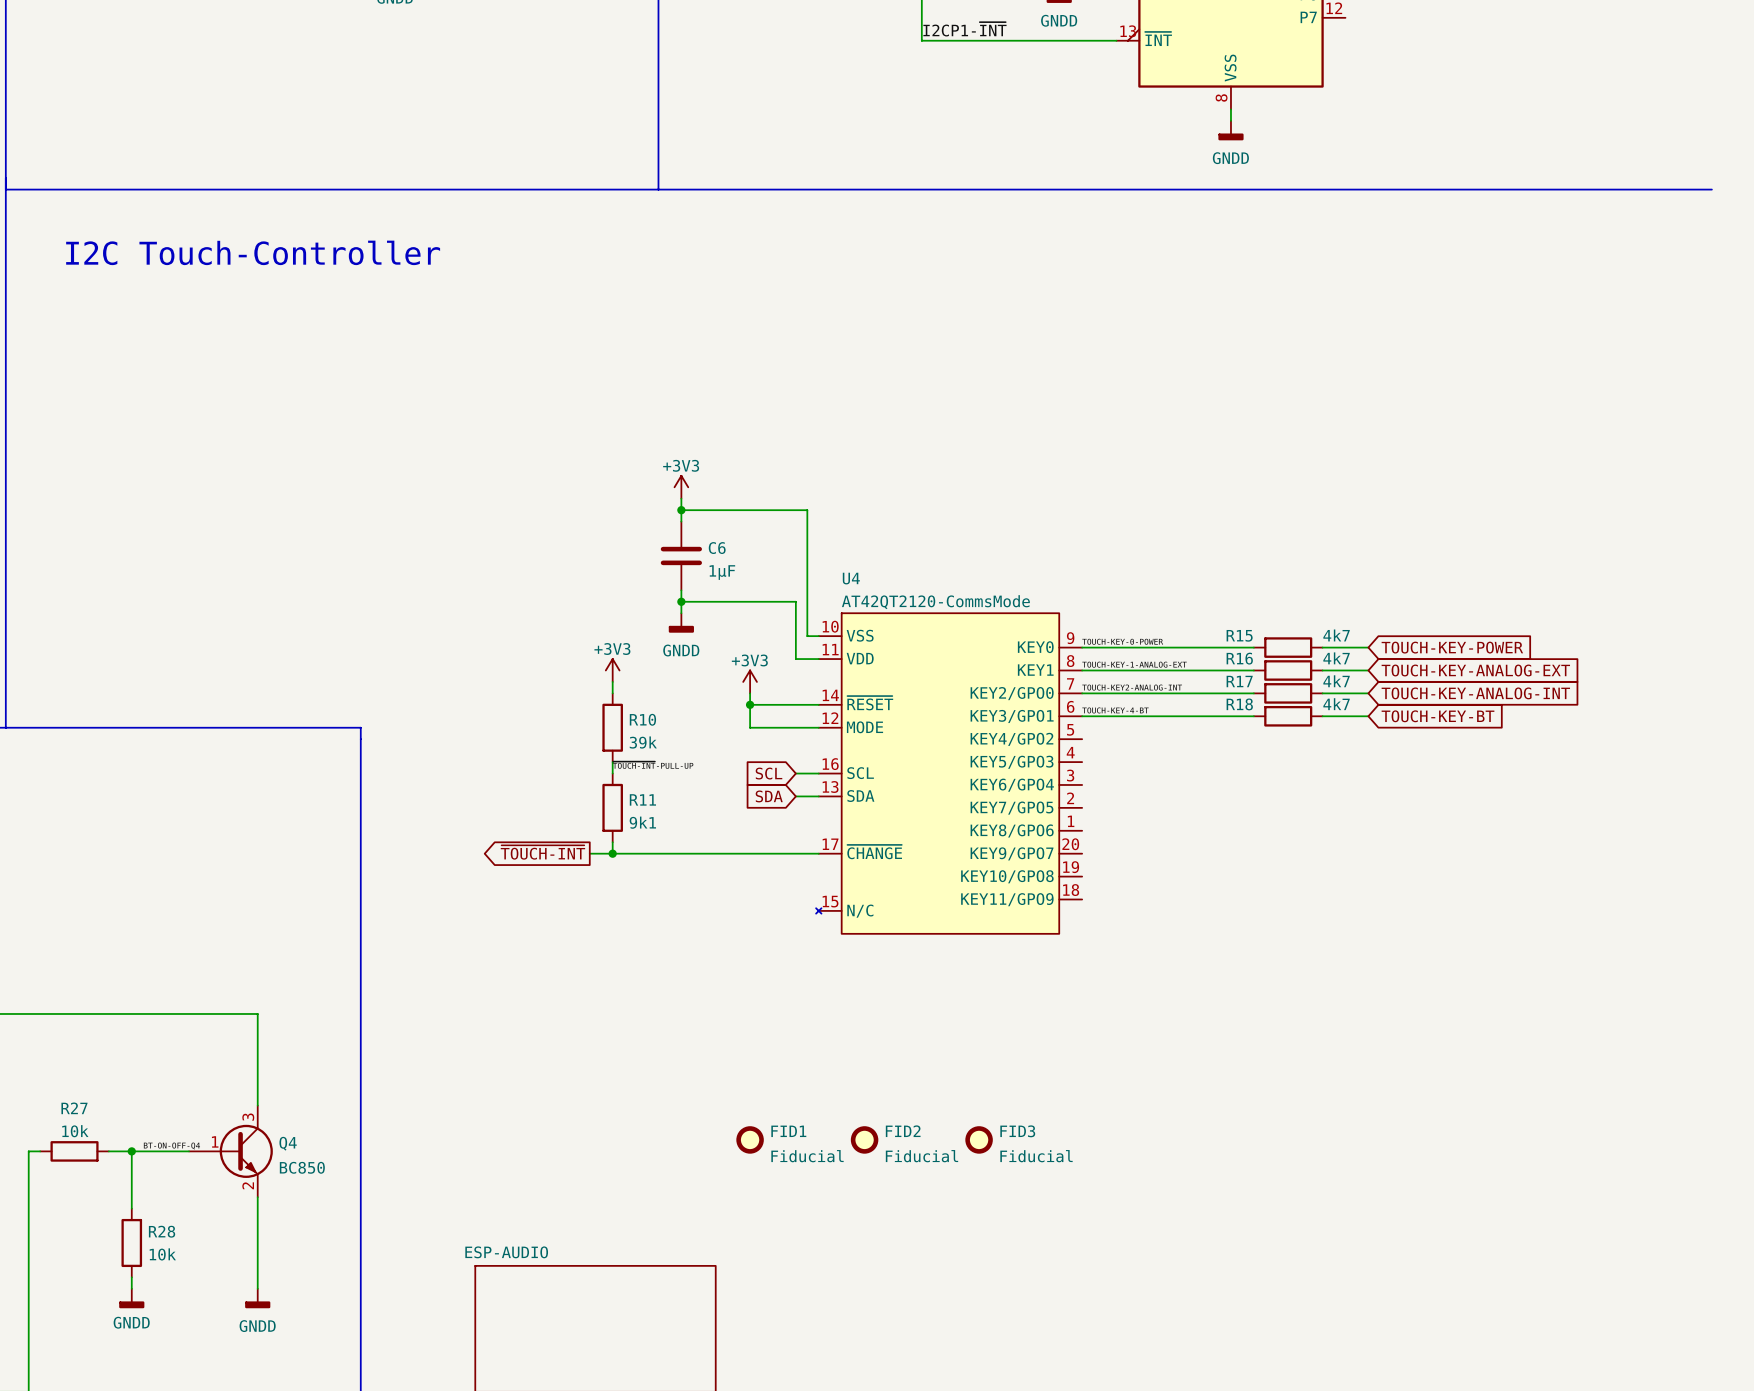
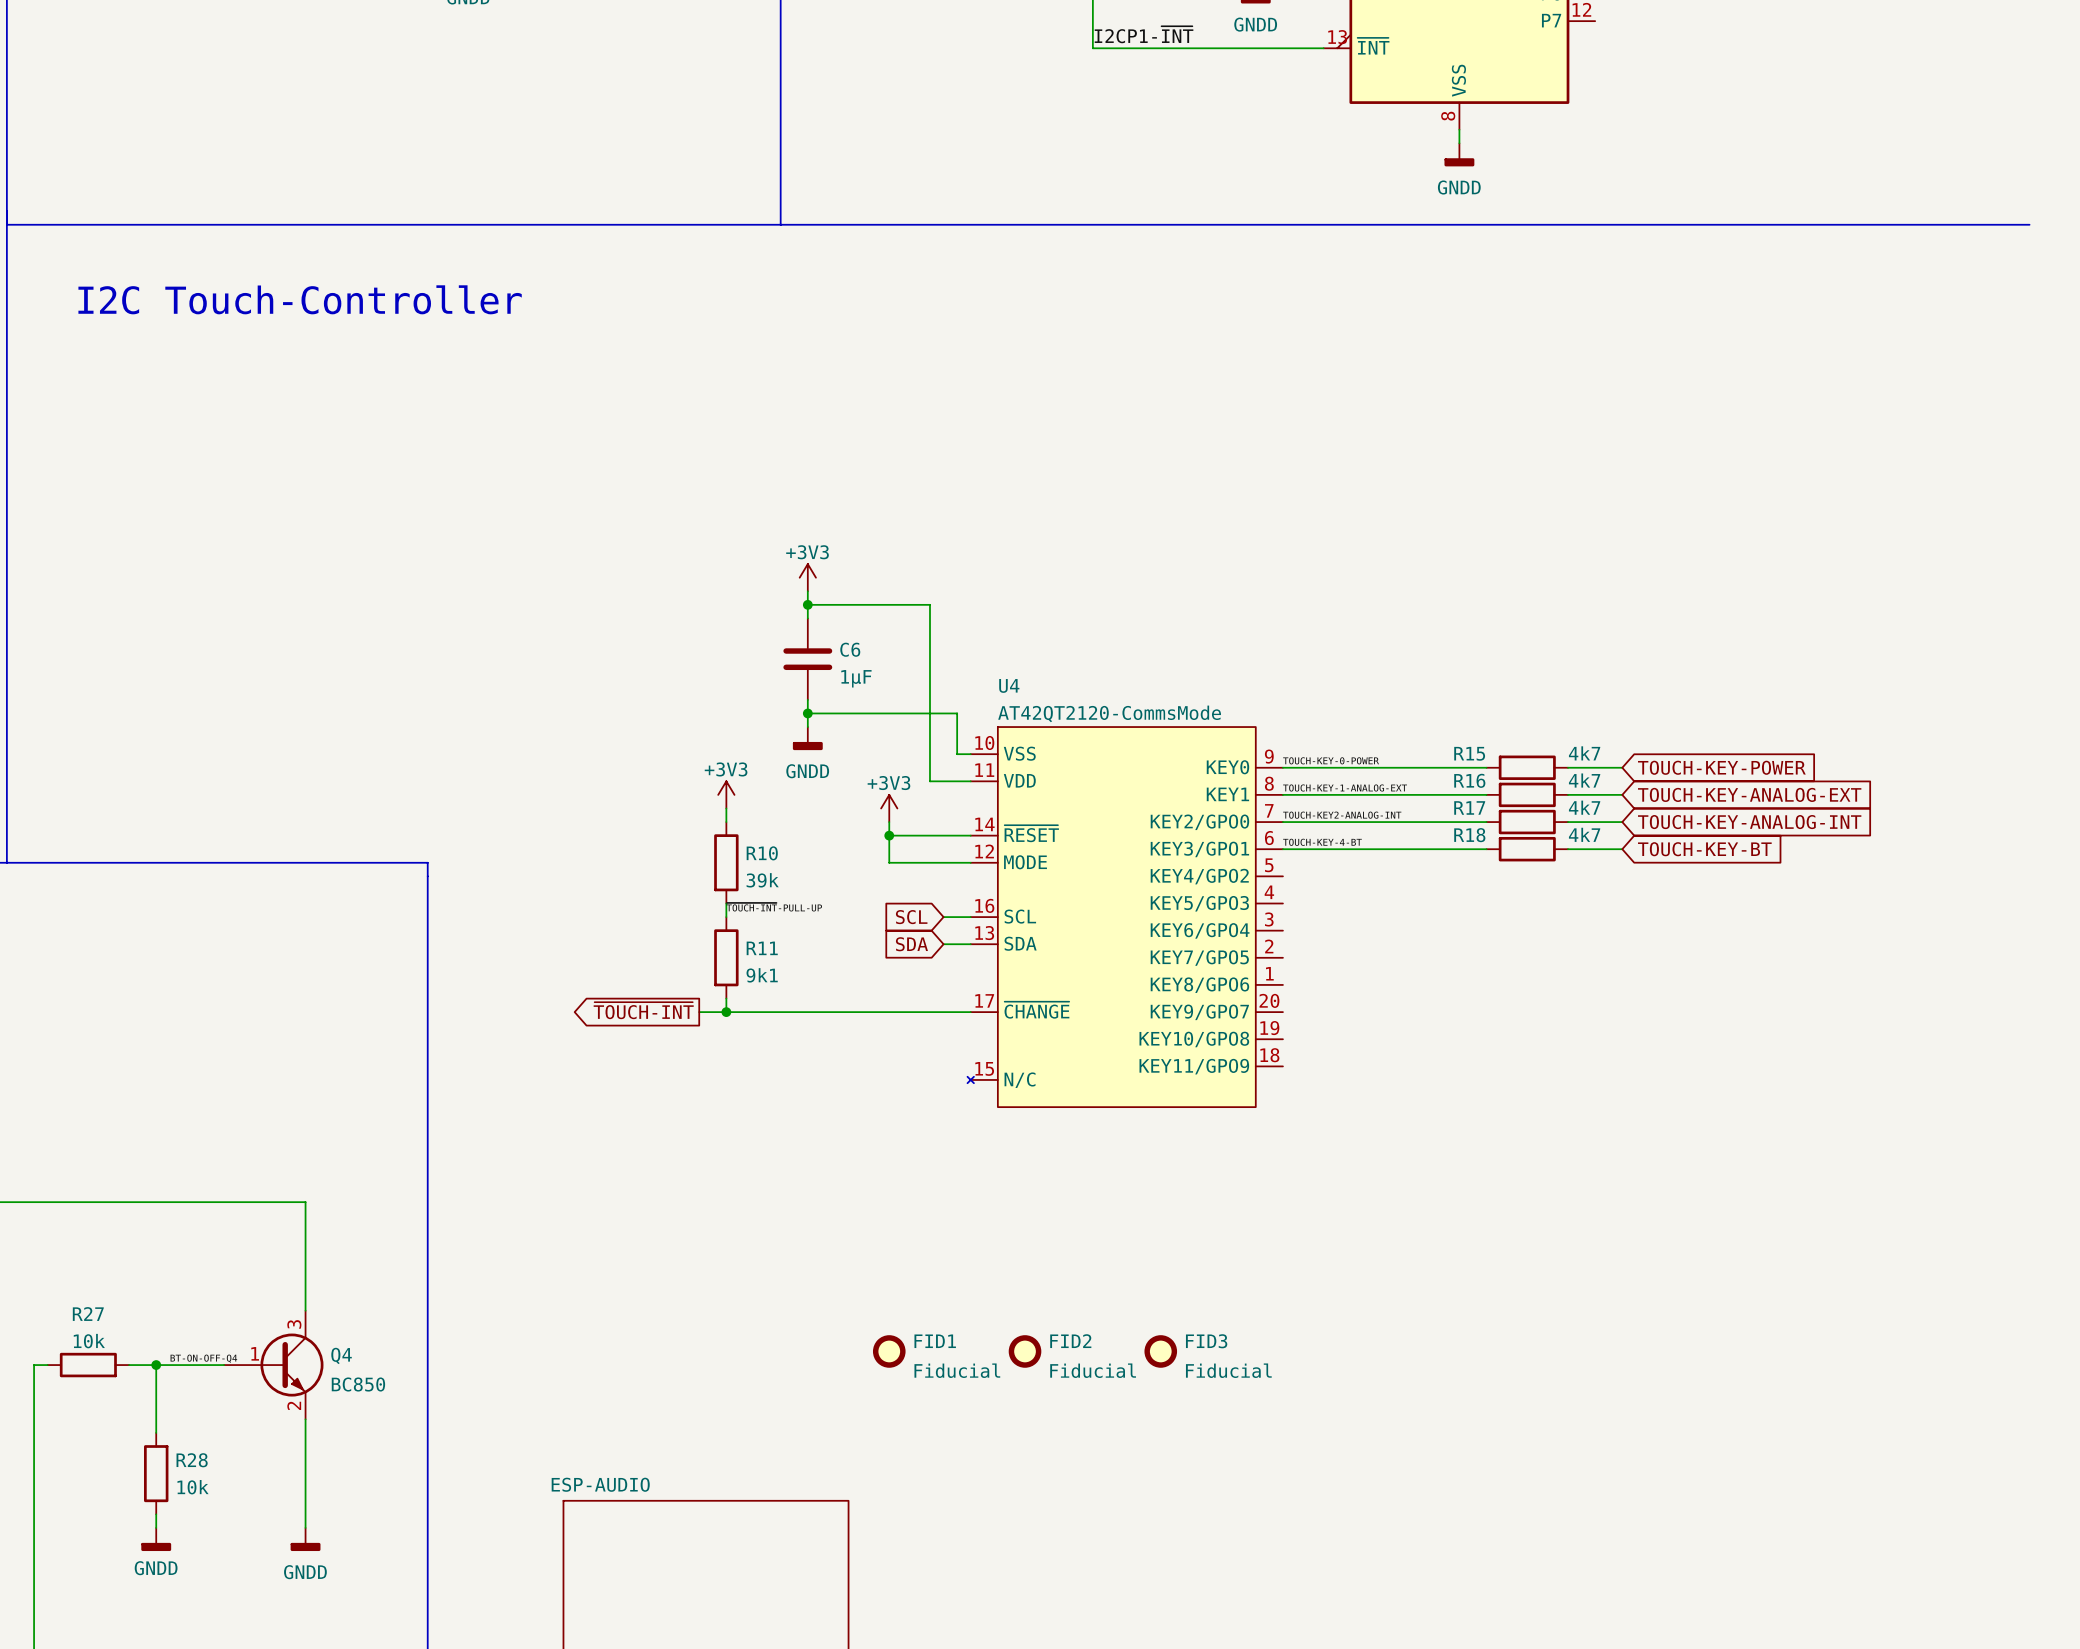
wire: (784, 510) (807, 510) (807, 601) -> (929, 604) (929, 781) (943, 781)
wire: (795, 601) (795, 659) -> (943, 713) (957, 713)

